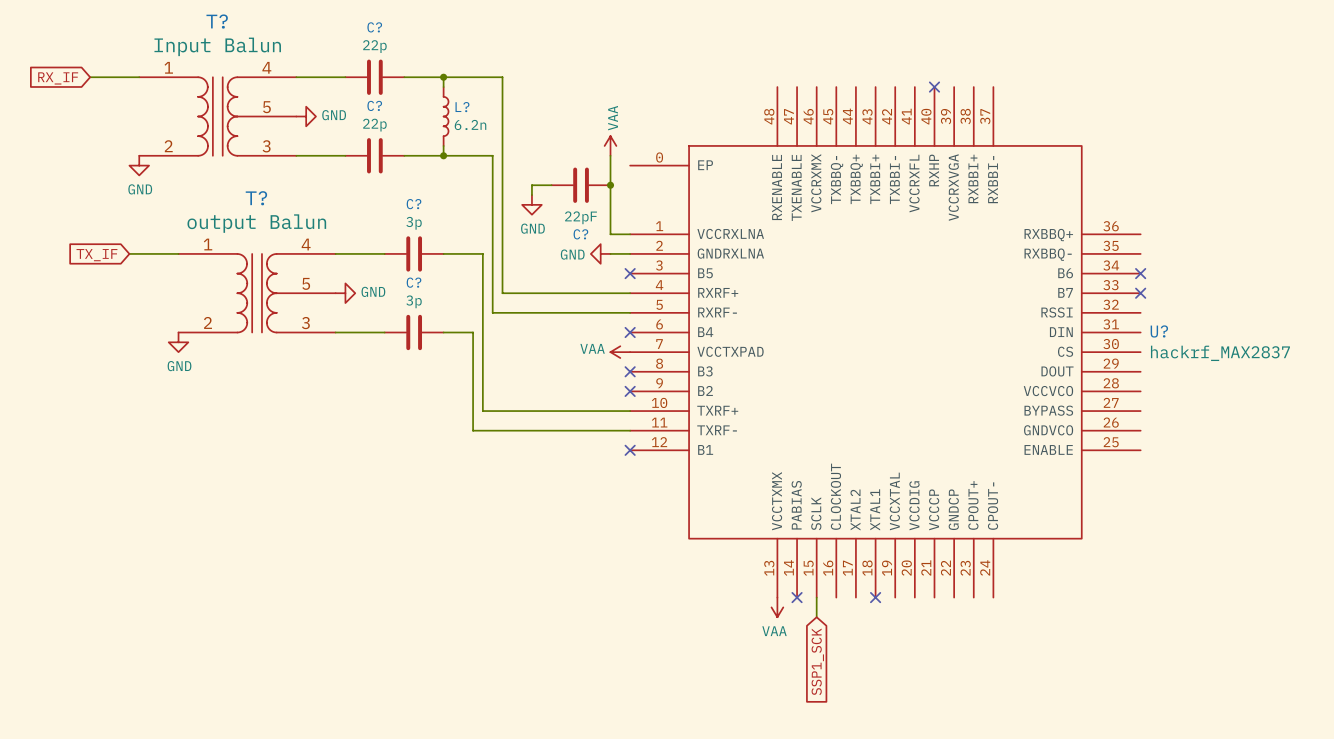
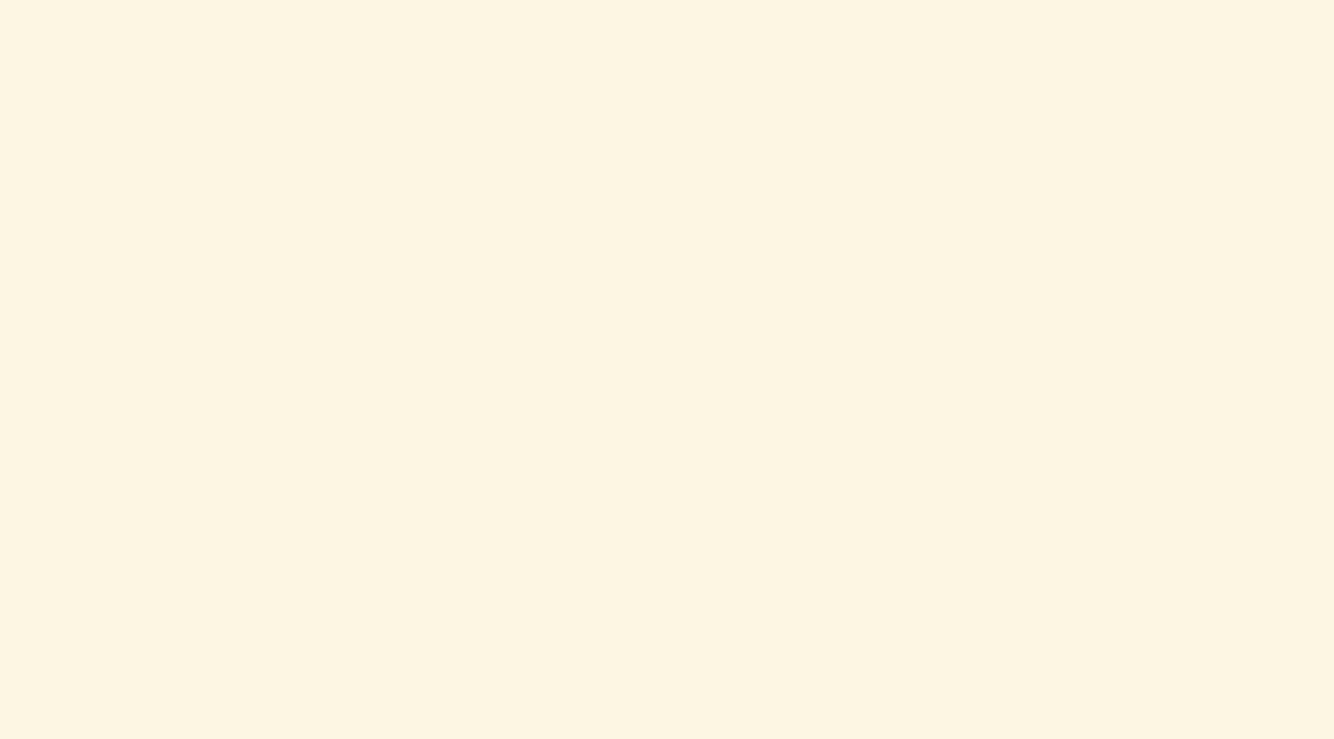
wire: (90, 77) (139, 77) -> none
wire: (296, 77) (345, 77) -> none
C?: 22p (374, 77) -> none
wire: (404, 77) (502, 77) (502, 293) (630, 293) -> none
wire: (443, 77) (443, 87) -> none
junction: (443, 77) -> none
global label: RX_IF (58, 78) -> none
no-connect mark: (934, 87) -> none
T?: Input Balun (217, 116) -> none
power symbol: GND (306, 116) -> none
L?: 6.2n (446, 116) -> none
wire: (443, 145) (443, 155) -> none
power symbol: VAA (610, 145) -> none
wire: (296, 155) (345, 155) -> none
C?: 22p (374, 155) -> none
wire: (404, 155) (492, 155) (492, 312) (630, 312) -> none
junction: (443, 155) -> none
wire: (610, 155) (610, 234) (630, 234) -> none
power symbol: GND (139, 165) -> none
wire: (551, 185) (531, 185) (531, 195) -> none
C?: 22pF (581, 185) -> none
junction: (610, 185) -> none
power symbol: GND (531, 204) -> none
wire: (129, 253) (178, 253) -> none
wire: (335, 253) (384, 253) -> none
C?: 3p (414, 253) -> none
wire: (443, 253) (482, 253) (482, 411) (630, 411) -> none
power symbol: GND (600, 253) -> none
wire: (610, 253) (630, 253) -> none
global label: TX_IF (96, 255) -> none
no-connect mark: (630, 273) -> none
no-connect mark: (1140, 273) -> none
T?: output Balun (257, 293) -> none
power symbol: GND (345, 293) -> none
no-connect mark: (1140, 293) -> none
wire: (335, 332) (384, 332) -> none
C?: 3p (414, 332) -> none
wire: (443, 332) (473, 332) (473, 430) (630, 430) -> none
no-connect mark: (630, 332) -> none
power symbol: GND (178, 342) -> none
U?: hackrf_MAX2837 (885, 342) -> none
power symbol: VAA (620, 352) -> none
no-connect mark: (630, 371) -> none
no-connect mark: (630, 391) -> none
no-connect mark: (630, 450) -> none
no-connect mark: (797, 597) -> none
wire: (816, 597) (816, 617) -> none
no-connect mark: (875, 597) -> none
power symbol: VAA (777, 607) -> none
global label: SSP1_SCK (817, 661) -> none

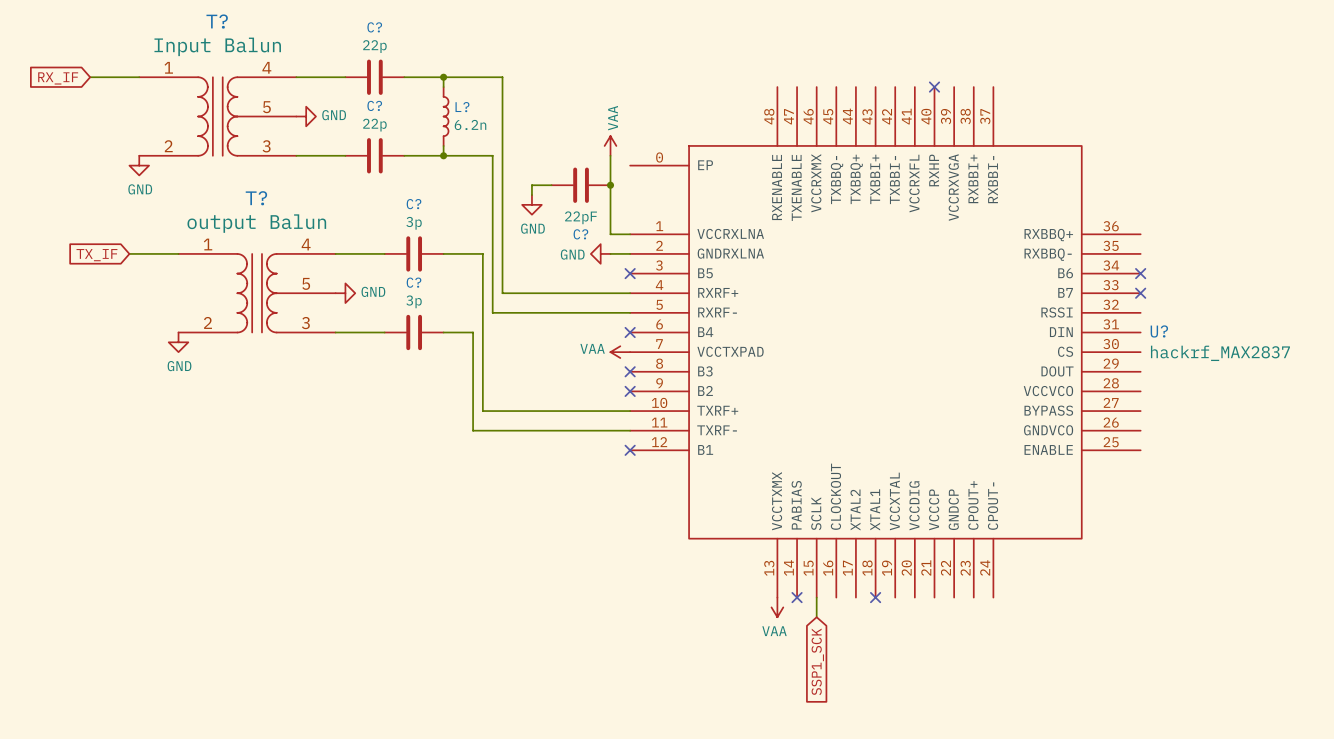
wire: none -> (90, 77) (139, 77)
wire: none -> (296, 77) (345, 77)
C?: none -> 22p (374, 77)
wire: none -> (404, 77) (502, 77) (502, 293) (630, 293)
wire: none -> (443, 77) (443, 87)
junction: none -> (443, 77)
global label: none -> RX_IF (58, 78)
no-connect mark: none -> (934, 87)
T?: none -> Input Balun (217, 116)
power symbol: none -> GND (306, 116)
L?: none -> 6.2n (446, 116)
wire: none -> (443, 145) (443, 155)
power symbol: none -> VAA (610, 145)
wire: none -> (296, 155) (345, 155)
C?: none -> 22p (374, 155)
wire: none -> (404, 155) (492, 155) (492, 312) (630, 312)
junction: none -> (443, 155)
wire: none -> (610, 155) (610, 234) (630, 234)
power symbol: none -> GND (139, 165)
wire: none -> (551, 185) (531, 185) (531, 195)
C?: none -> 22pF (581, 185)
junction: none -> (610, 185)
power symbol: none -> GND (531, 204)
wire: none -> (129, 253) (178, 253)
wire: none -> (335, 253) (384, 253)
C?: none -> 3p (414, 253)
wire: none -> (443, 253) (482, 253) (482, 411) (630, 411)
power symbol: none -> GND (600, 253)
wire: none -> (610, 253) (630, 253)
global label: none -> TX_IF (96, 255)
no-connect mark: none -> (630, 273)
no-connect mark: none -> (1140, 273)
T?: none -> output Balun (257, 293)
power symbol: none -> GND (345, 293)
no-connect mark: none -> (1140, 293)
wire: none -> (335, 332) (384, 332)
C?: none -> 3p (414, 332)
wire: none -> (443, 332) (473, 332) (473, 430) (630, 430)
no-connect mark: none -> (630, 332)
power symbol: none -> GND (178, 342)
U?: none -> hackrf_MAX2837 (885, 342)
power symbol: none -> VAA (620, 352)
no-connect mark: none -> (630, 371)
no-connect mark: none -> (630, 391)
no-connect mark: none -> (630, 450)
no-connect mark: none -> (797, 597)
wire: none -> (816, 597) (816, 617)
no-connect mark: none -> (875, 597)
power symbol: none -> VAA (777, 607)
global label: none -> SSP1_SCK (817, 661)

